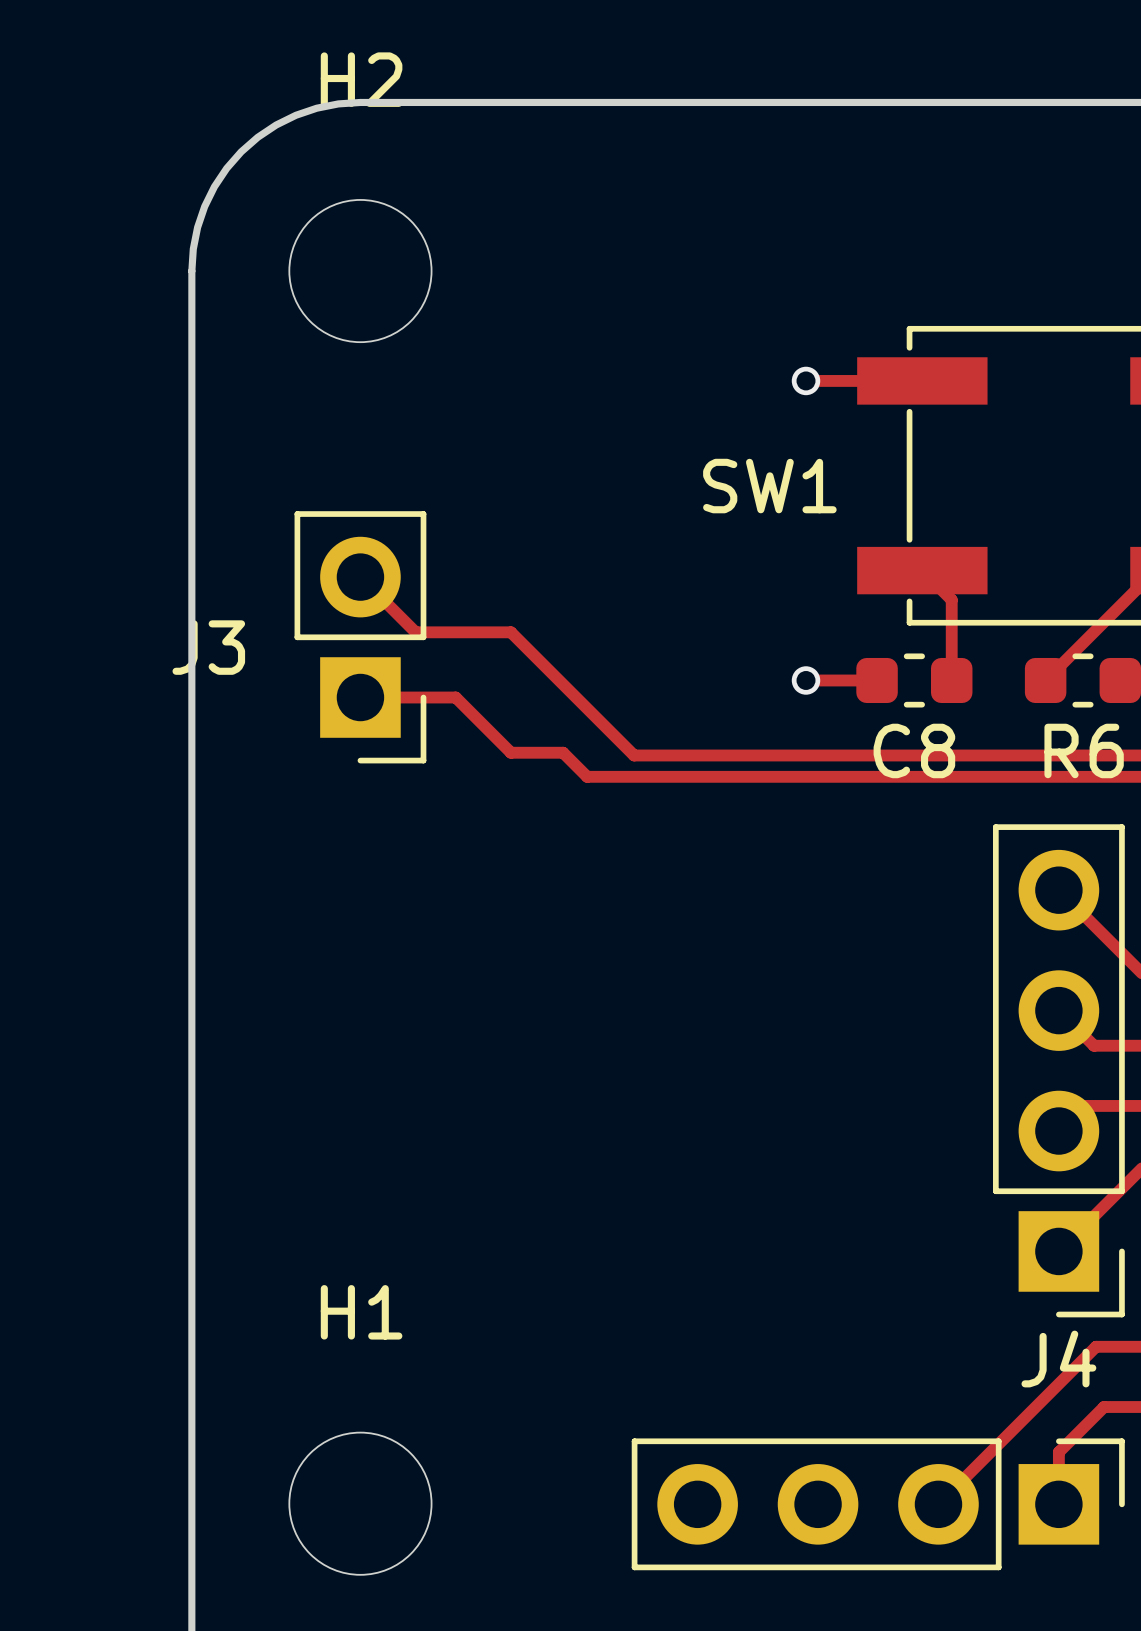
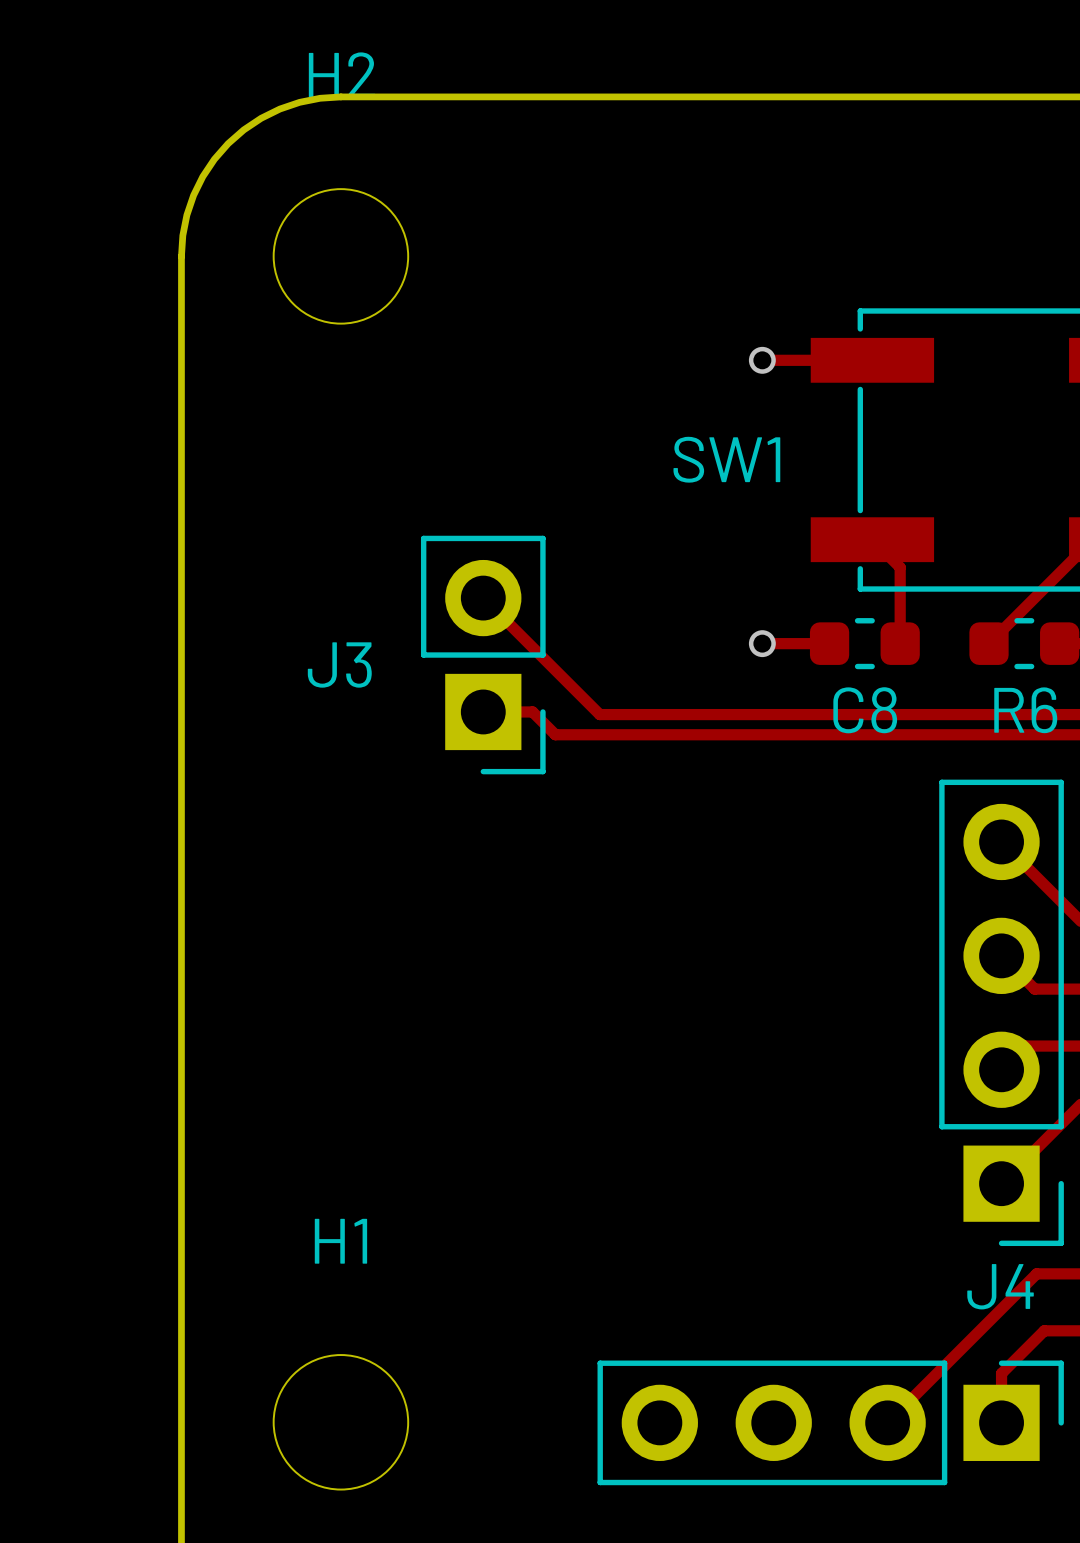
track: (360, 577) (415, 632) (510, 632) -> none
J3 position: (360, 637) -> (483, 655)
track: (360, 697) (455, 697) (510, 752) -> none

